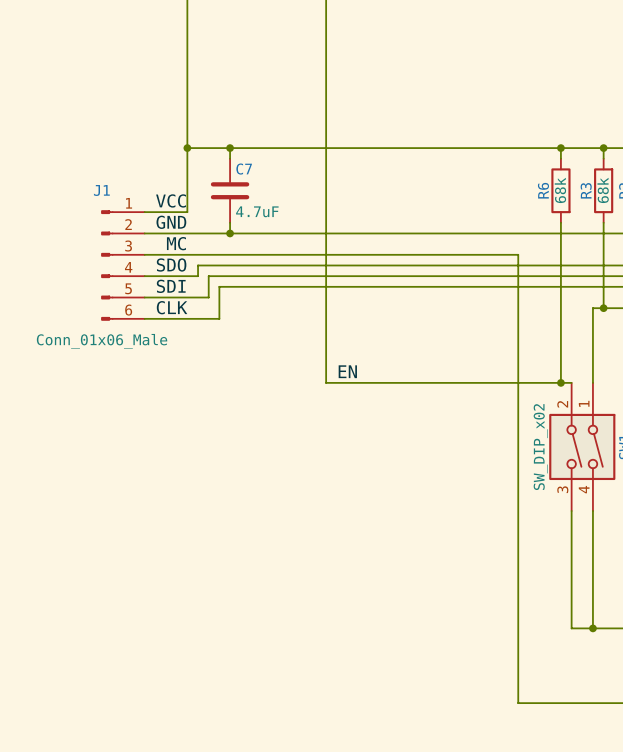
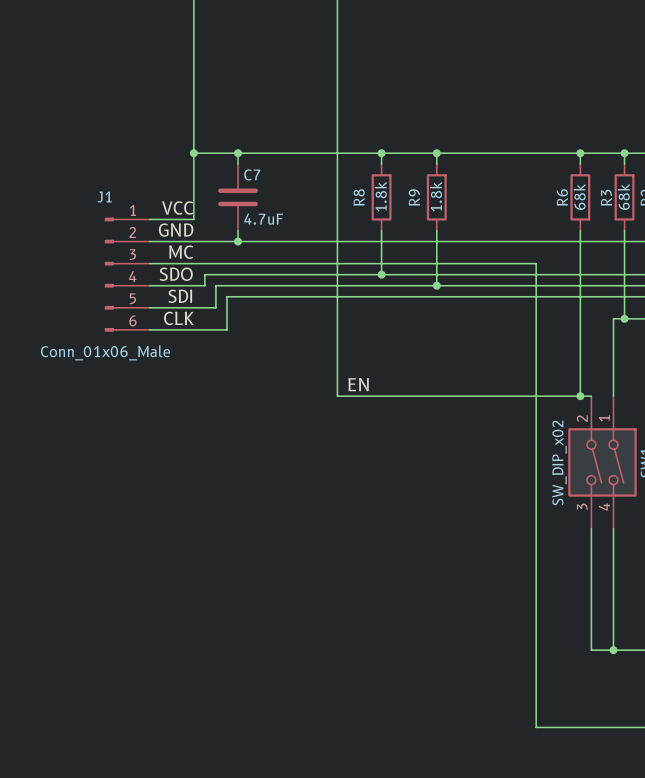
wire: none -> (381, 153) (381, 164)
junction: none -> (381, 153)
wire: none -> (436, 153) (436, 164)
junction: none -> (436, 153)
R8: none -> 1.8k (381, 197)
R9: none -> 1.8k (436, 197)
wire: none -> (381, 230) (381, 274)
wire: none -> (436, 230) (436, 285)
junction: none -> (381, 274)
junction: none -> (436, 285)

